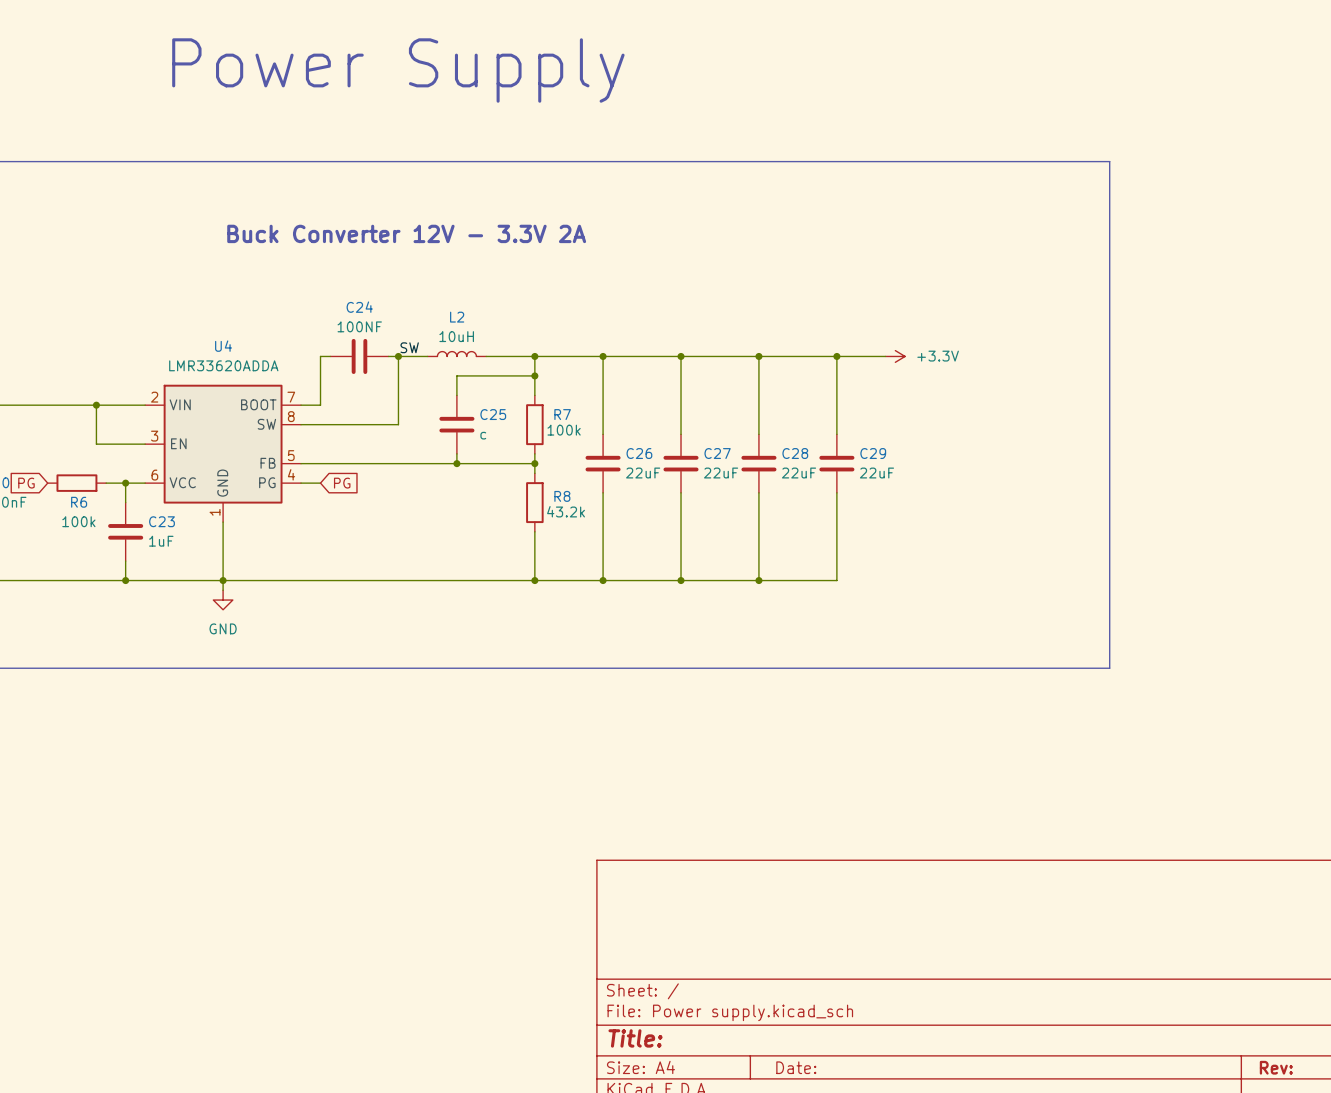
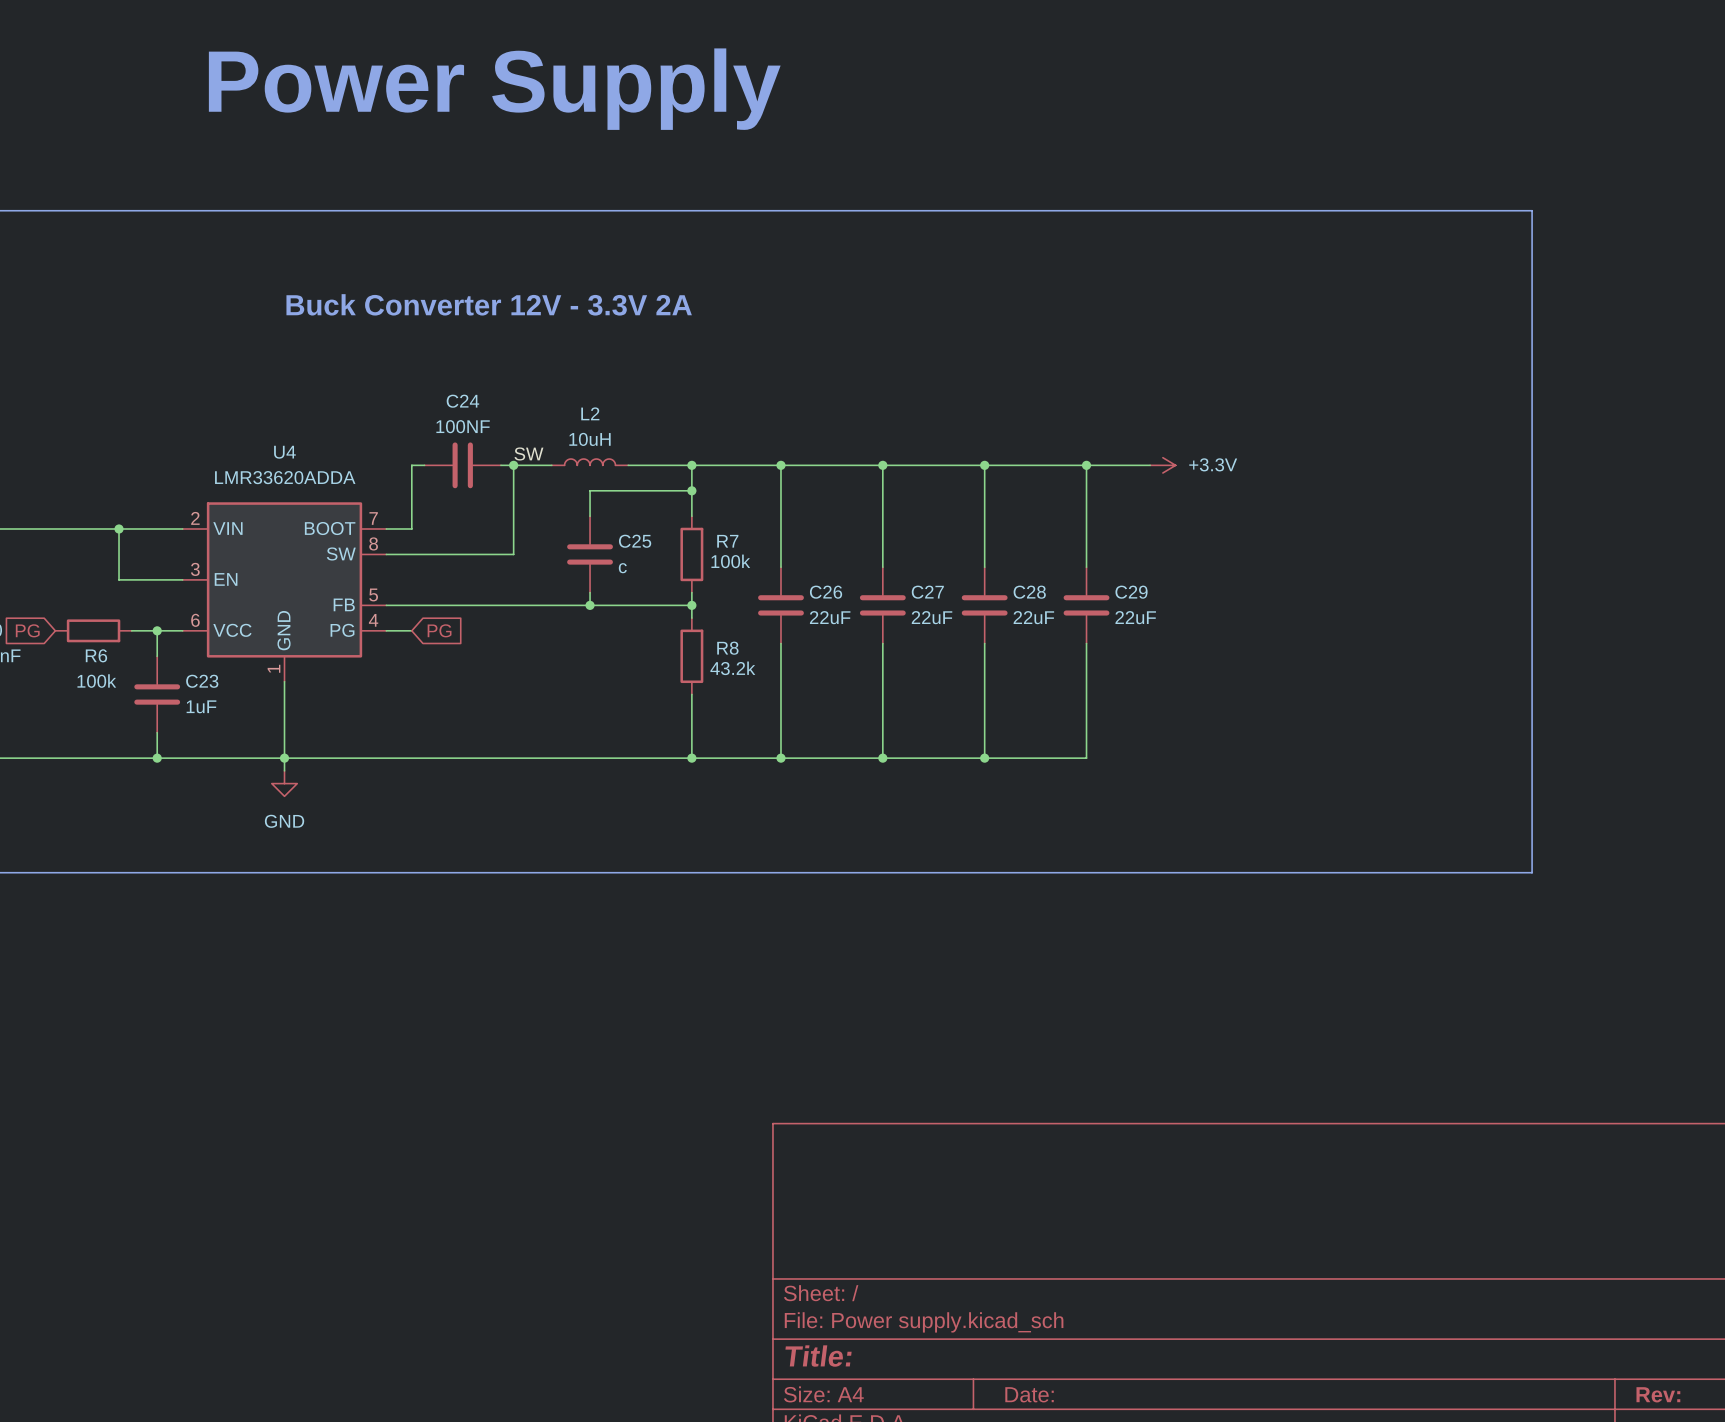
line: (1109, 161) (1109, 668) -> (1442, 210) (1532, 210) (1532, 872) (1442, 872)

